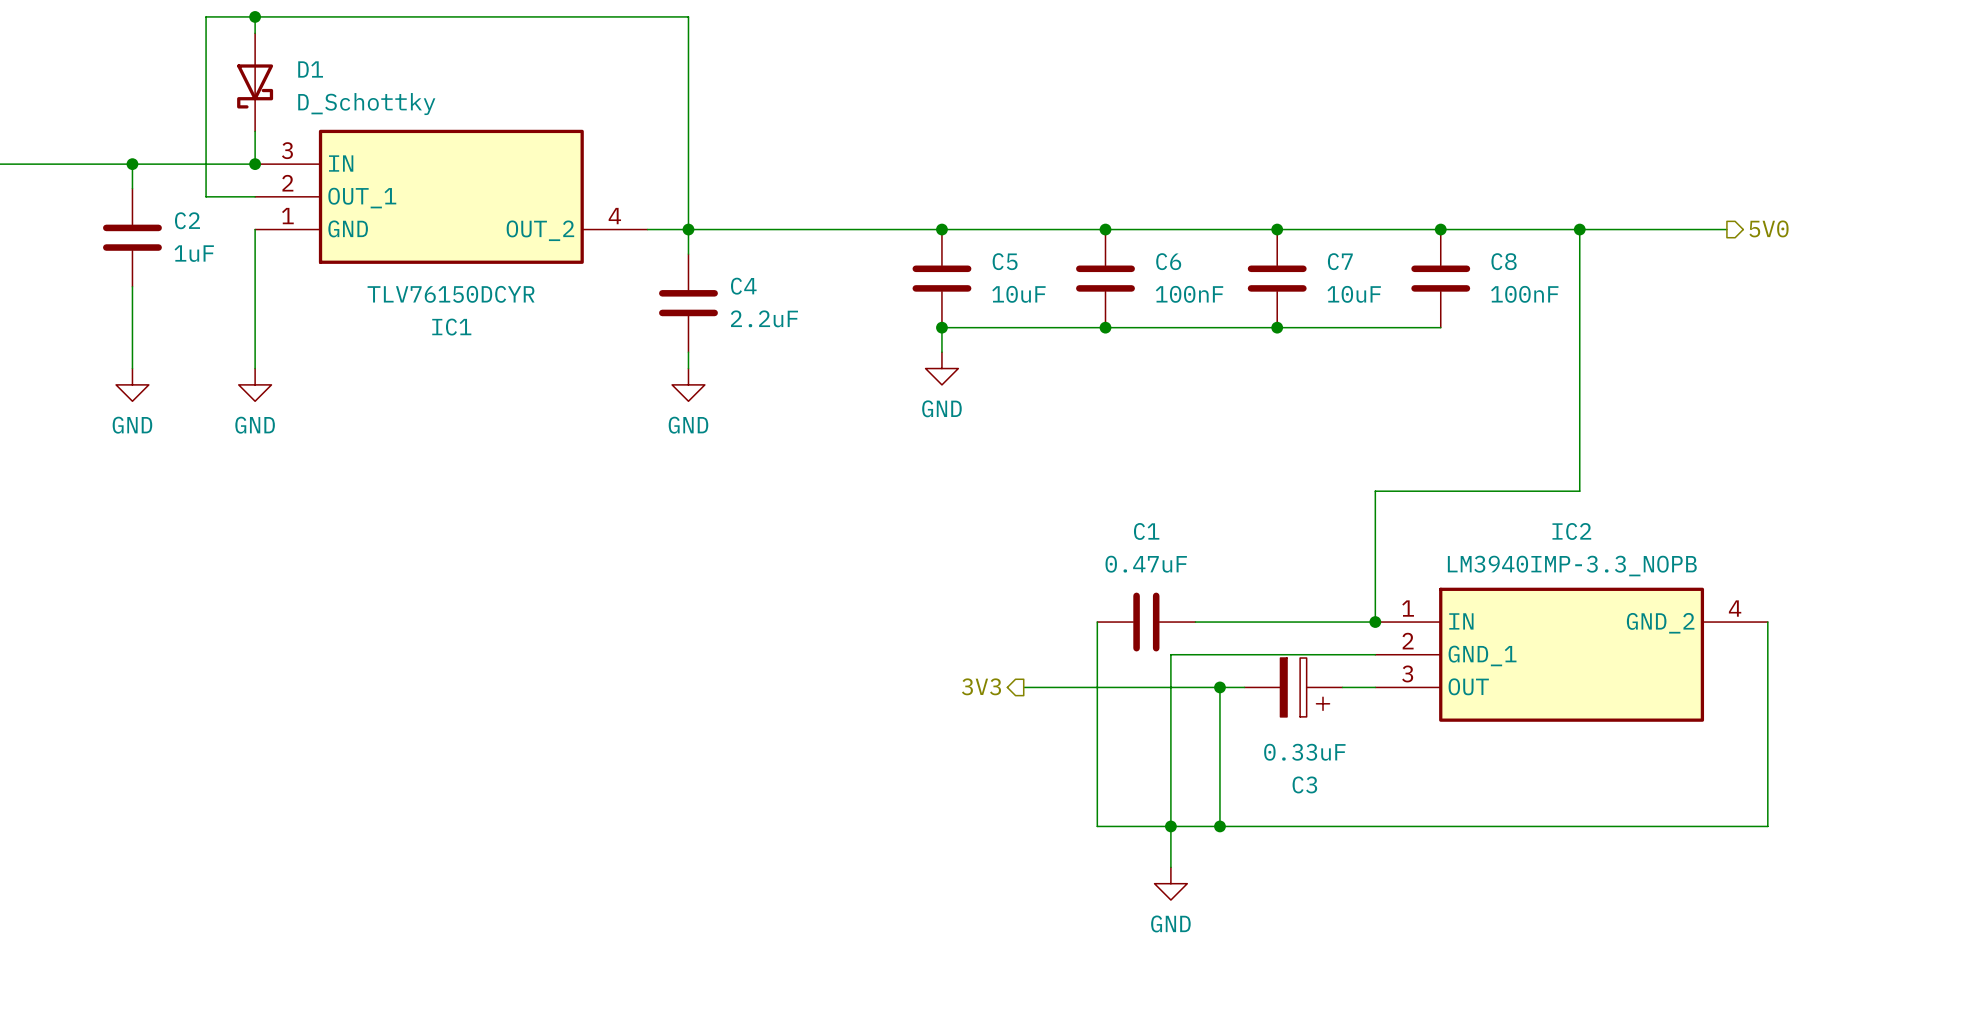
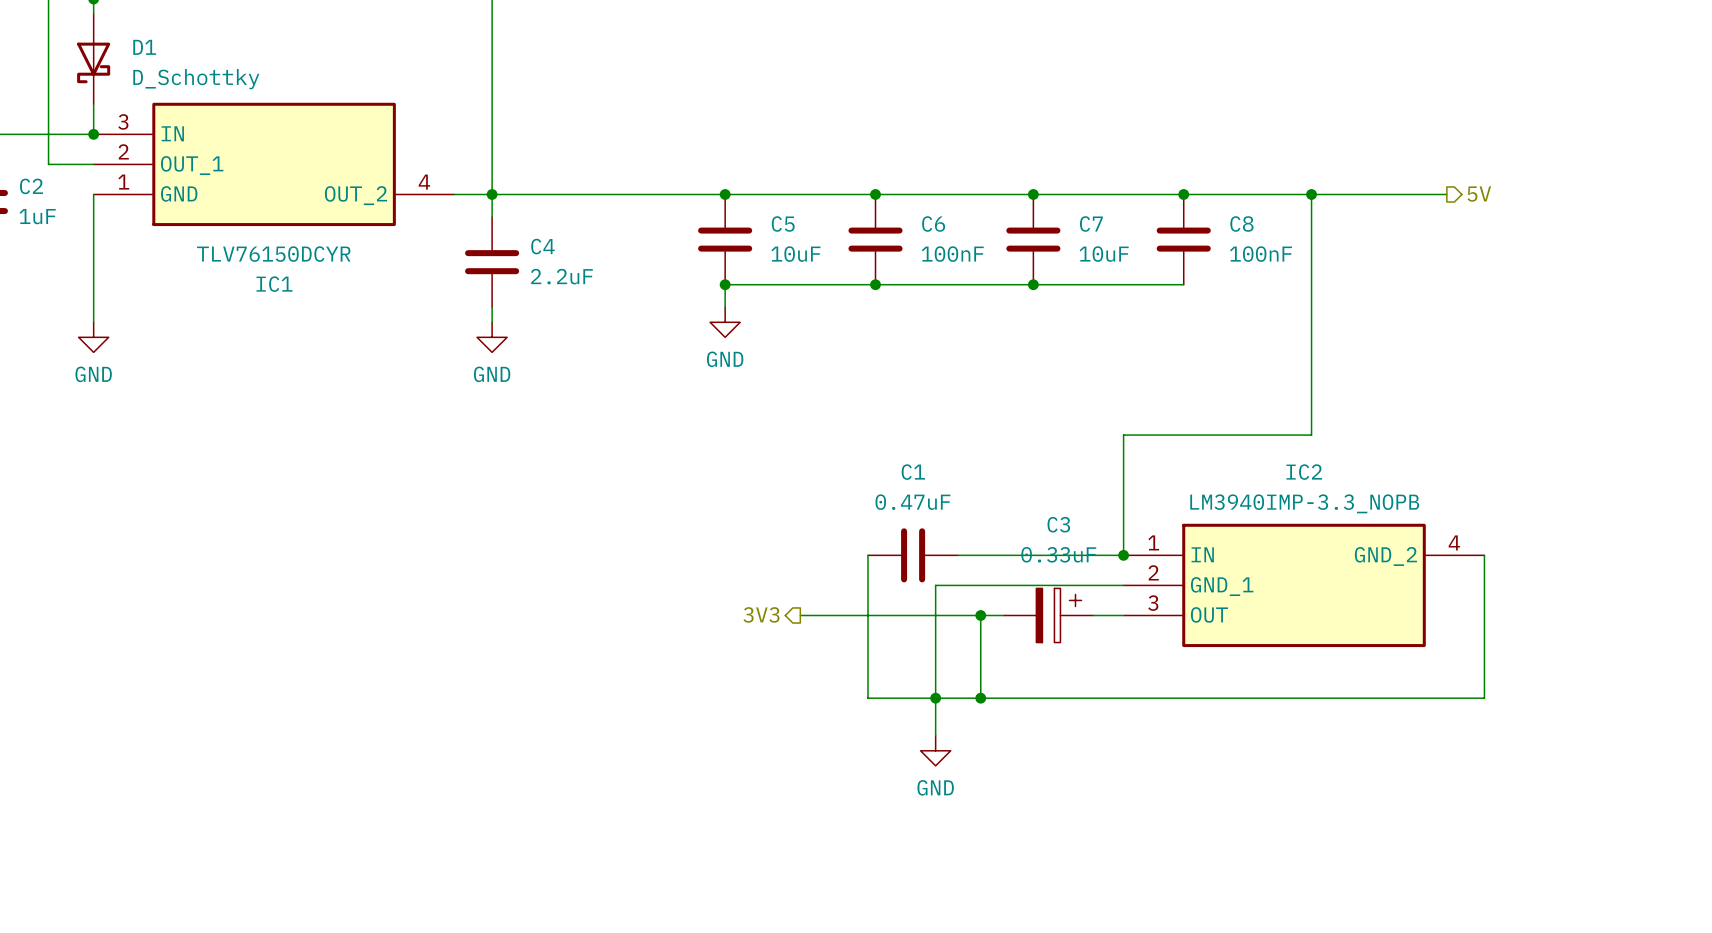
hierarchical label: 5V0 (1768, 228) -> 5V (1479, 194)
C3 flip: as is (1305, 687) -> up-down (1058, 615)
wire: (1097, 777) (1097, 826) (1767, 826) (1767, 777) -> (867, 698) (1484, 698)
junction: none -> (935, 698)
wire: (1219, 777) (1219, 826) -> none
junction: none -> (980, 698)
wire: (1170, 818) (1170, 867) -> none
junction: (1170, 826) -> none
junction: (1219, 826) -> none
power symbol position: GND (1170, 883) -> GND (935, 750)

